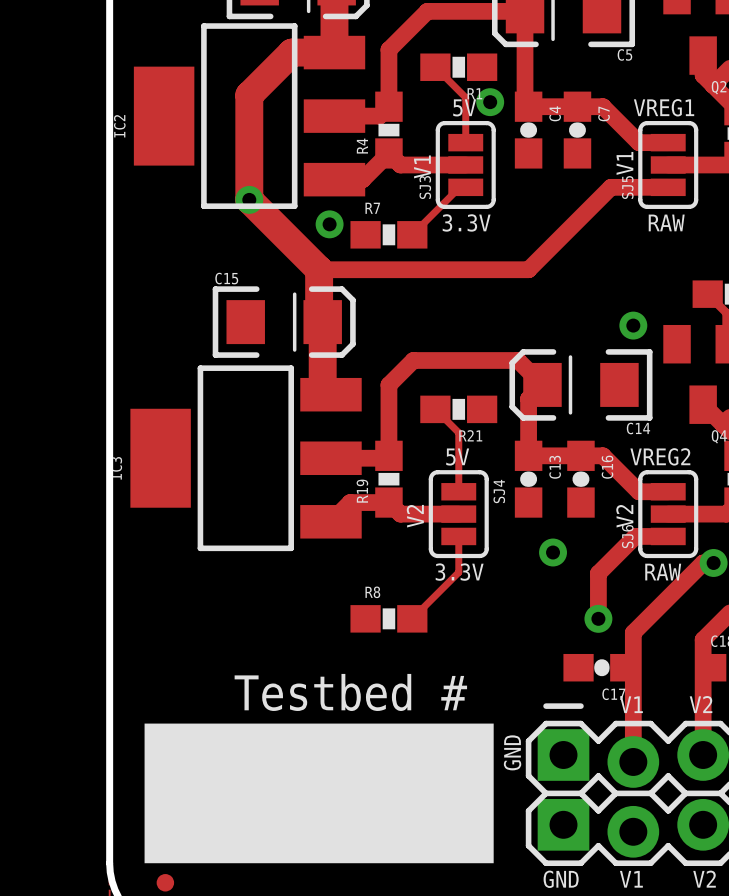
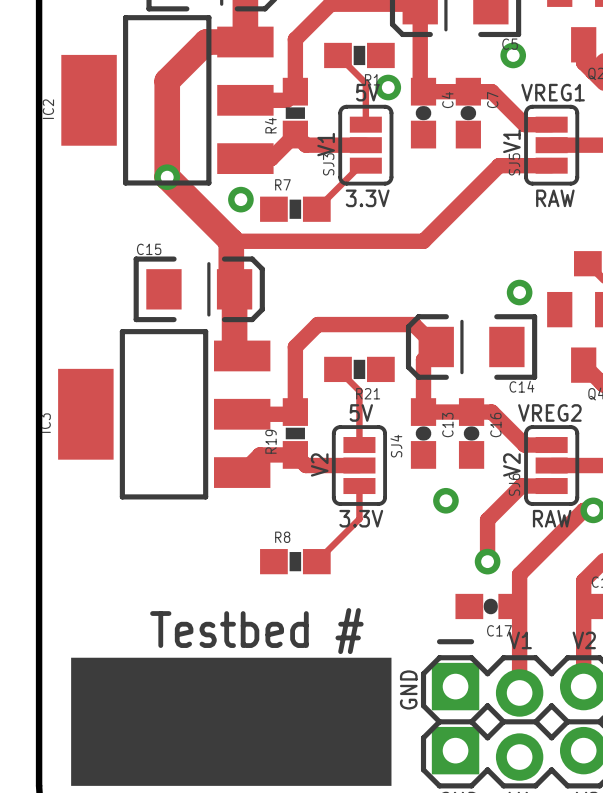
via: none -> (513, 55)

